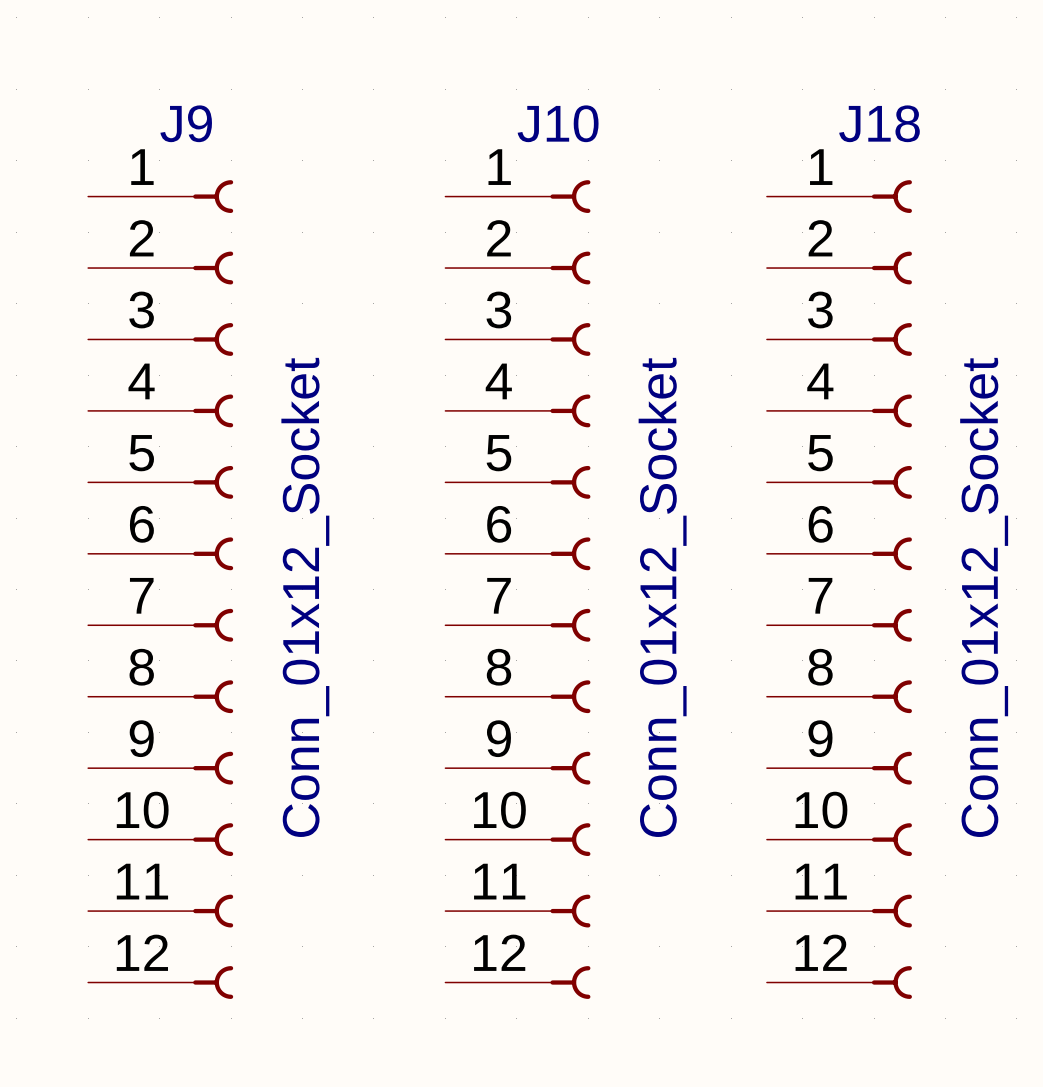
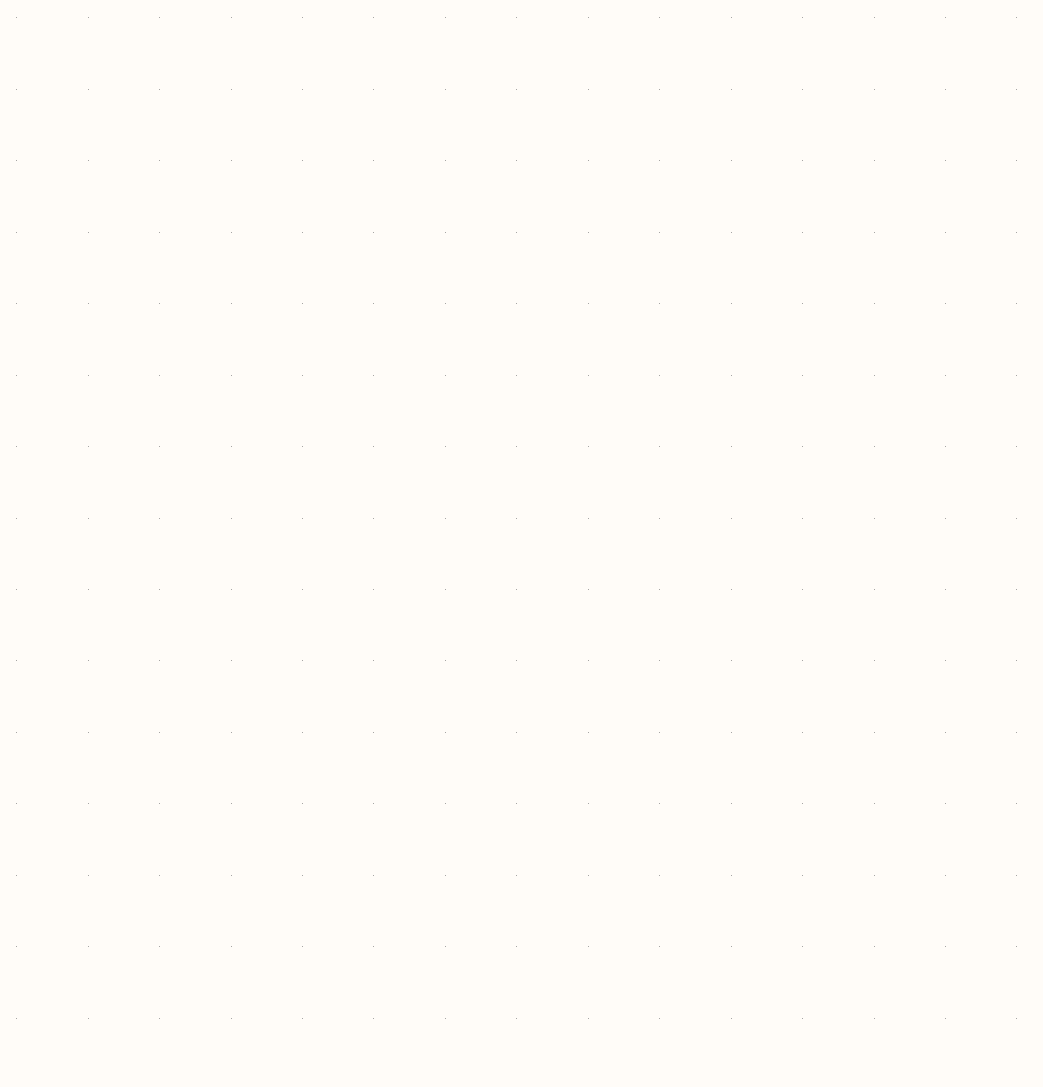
J9: Conn_01x12_Socket (160, 589) -> none
J10: Conn_01x12_Socket (517, 589) -> none
J18: Conn_01x12_Socket (839, 589) -> none

